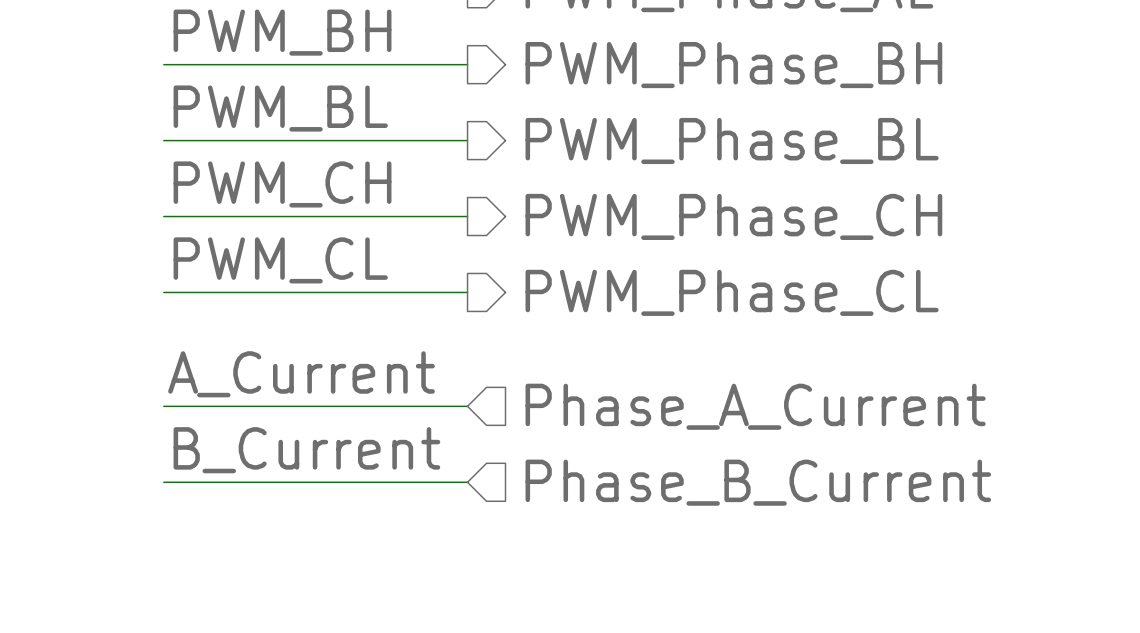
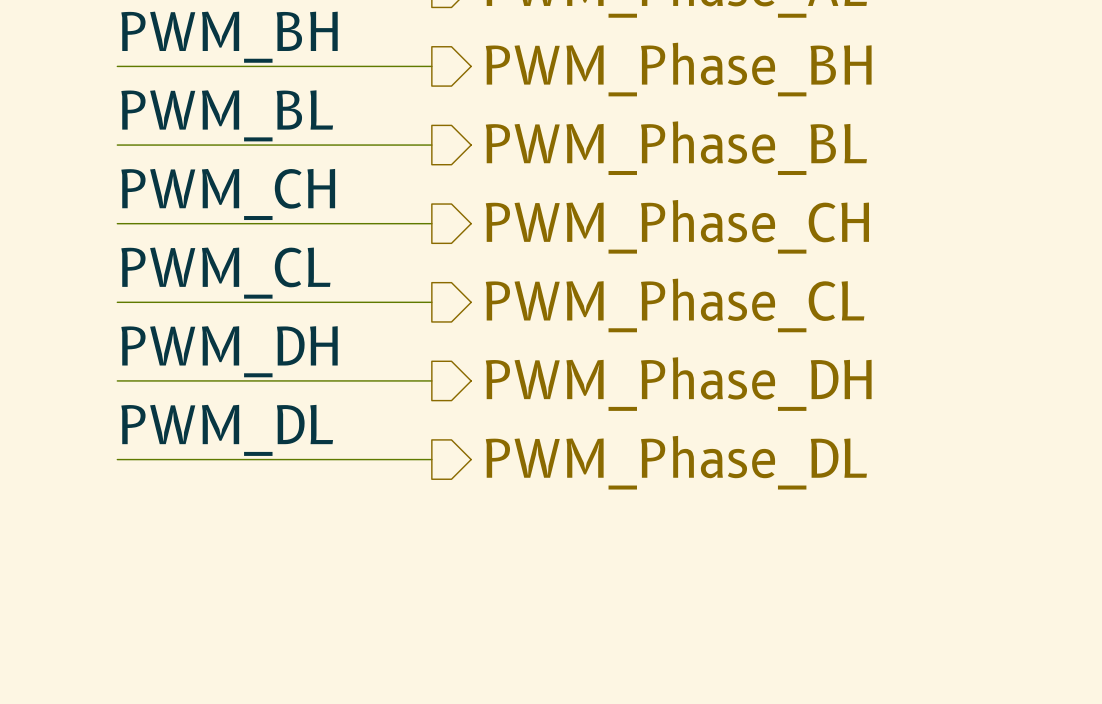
label: none -> PWM_DH (229, 351)
hierarchical label: none -> PWM_Phase_DH (678, 384)
label: A_Current (301, 374) -> none
wire: (163, 406) (467, 406) -> (117, 380) (431, 380)
hierarchical label: Phase_A_Current (755, 406) -> none
label: none -> PWM_DL (227, 430)
hierarchical label: none -> PWM_Phase_DL (676, 462)
label: B_Current (306, 450) -> none
wire: (163, 482) (467, 482) -> (117, 459) (431, 459)
hierarchical label: Phase_B_Current (758, 482) -> none

